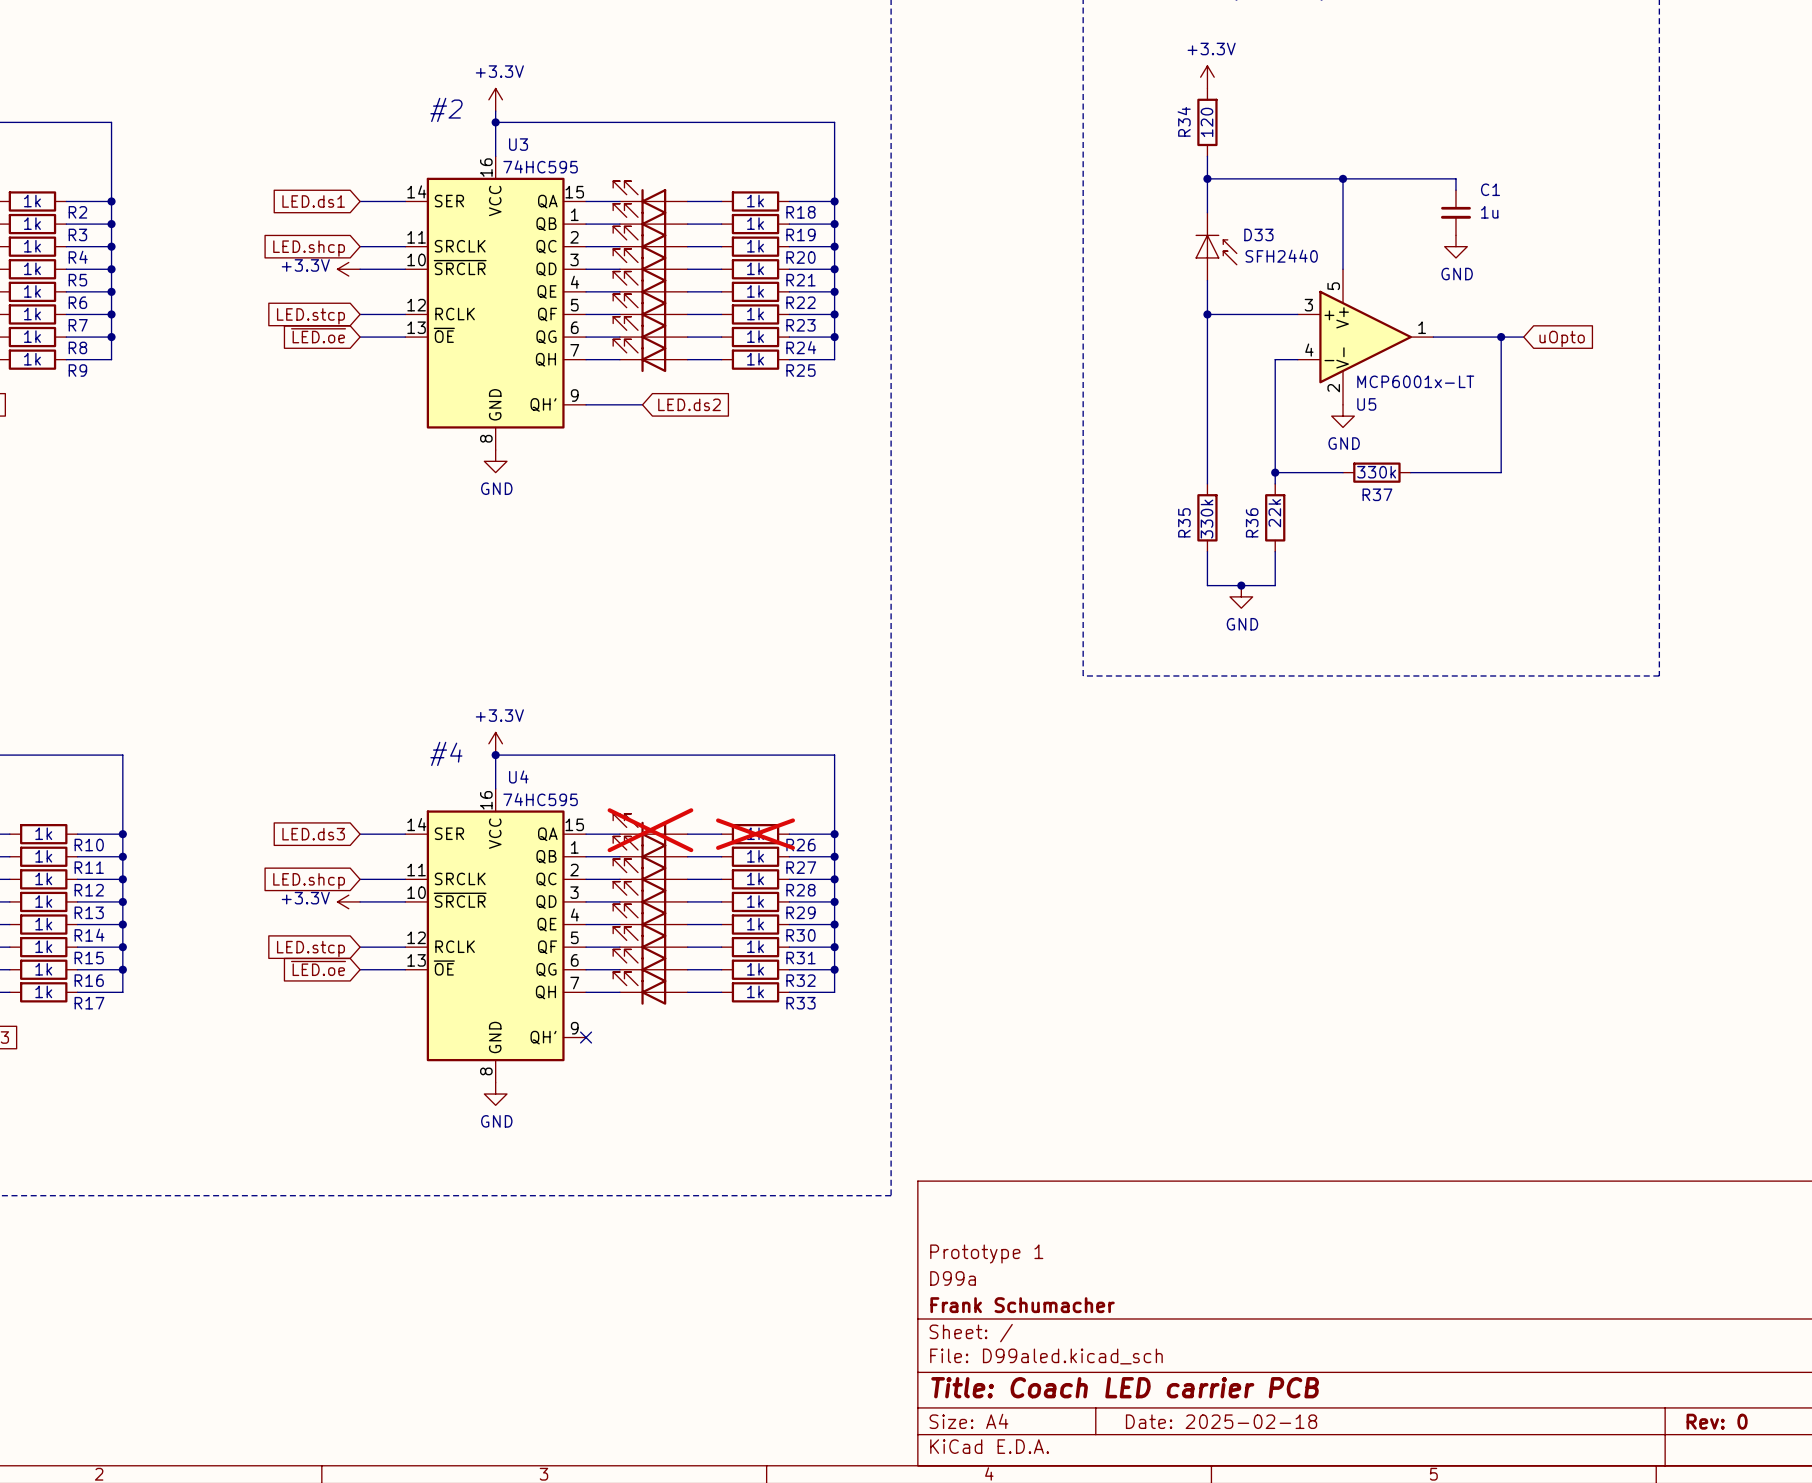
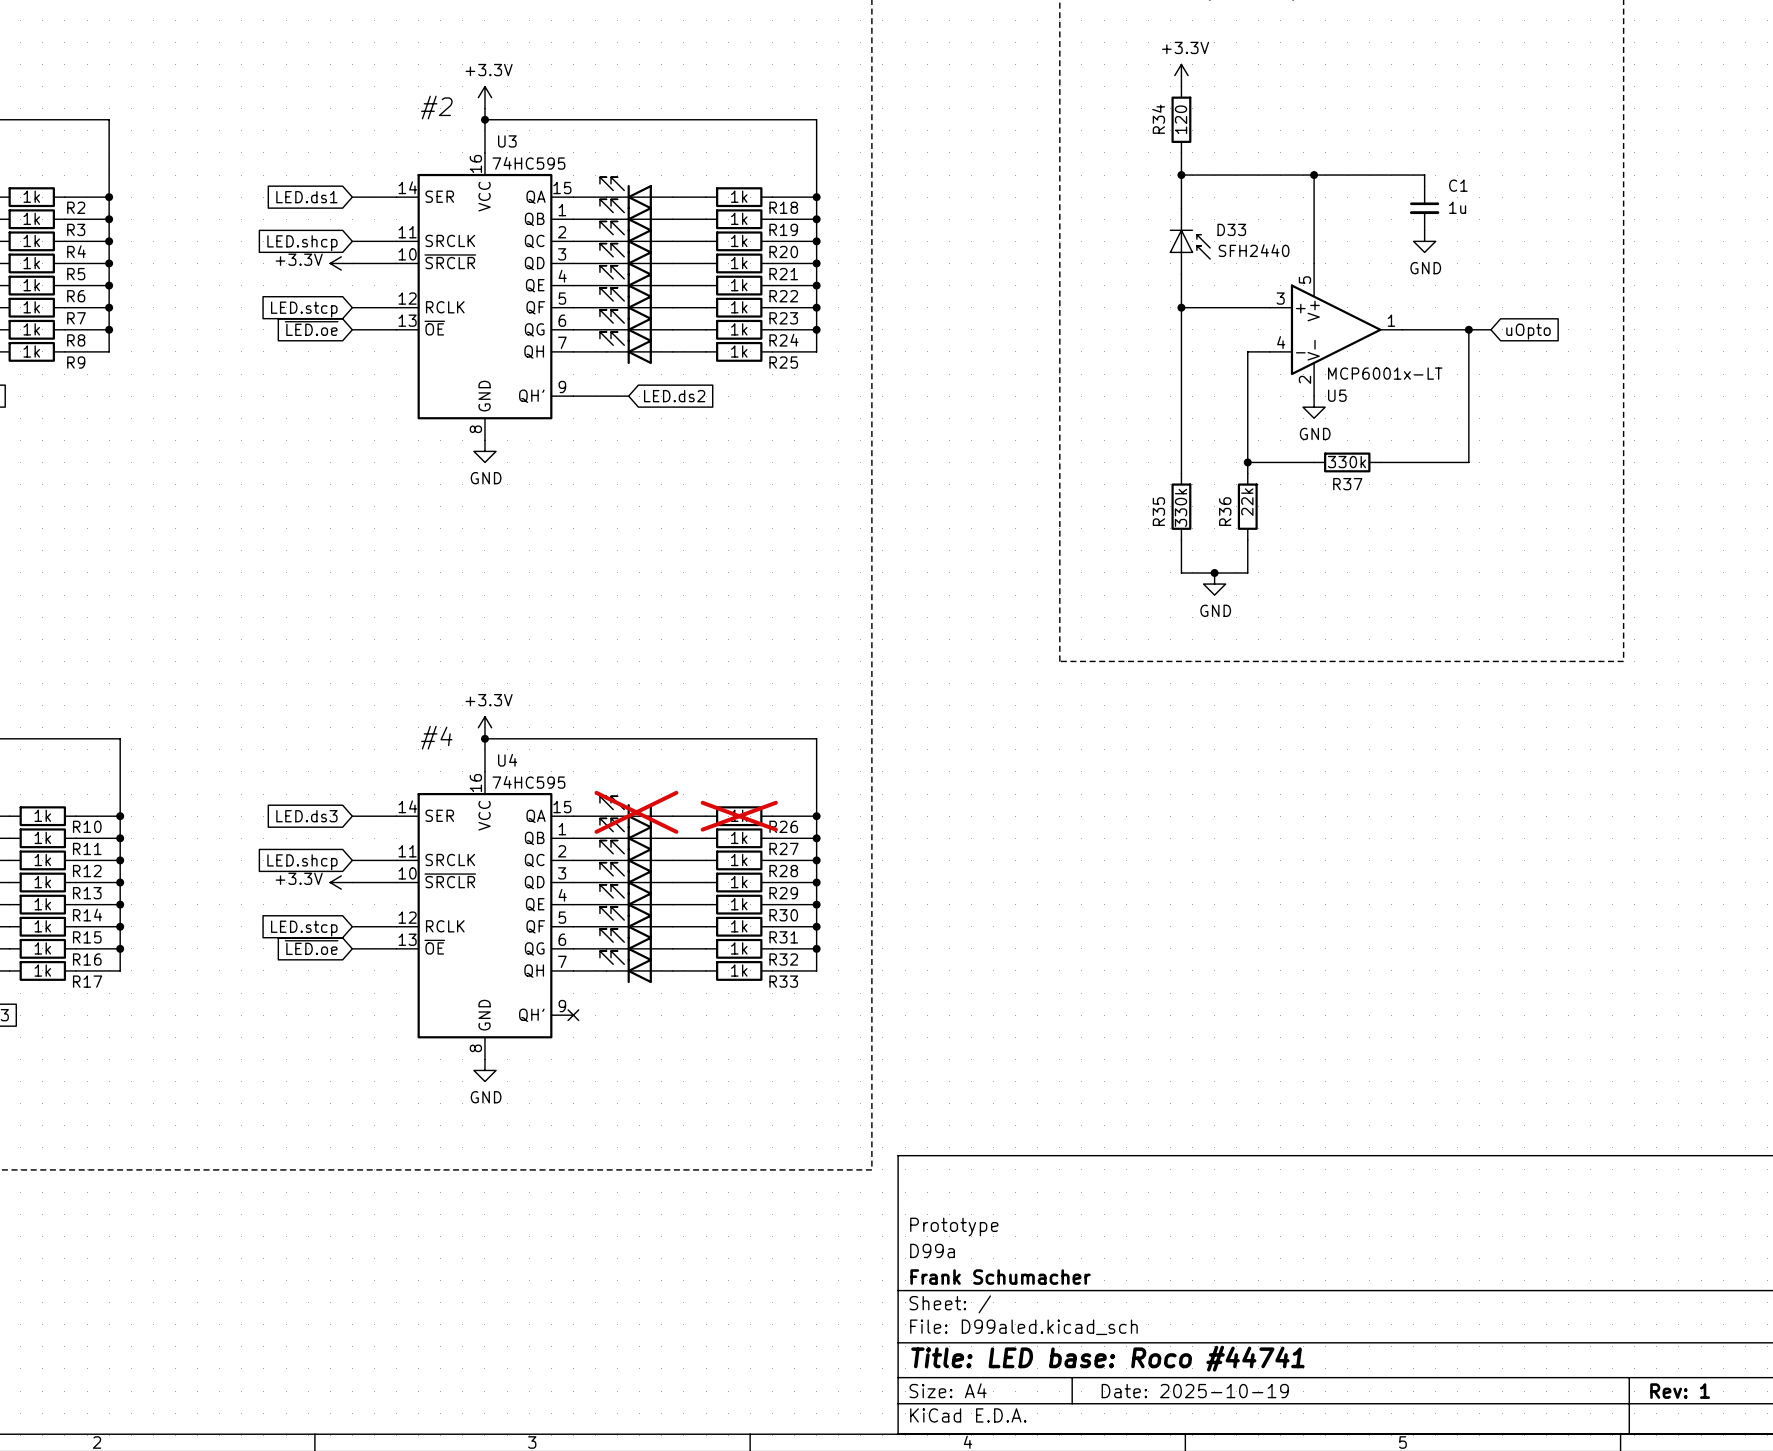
title block: Prototype 1 (986, 1254) -> Prototype (954, 1226)
title block: Title: Coach LED carrier PCB (1125, 1387) -> Title: LED base: Roco #44741 (1107, 1358)
title block: Date: 2025-02-18 (1221, 1421) -> Date: 2025-10-19 (1195, 1391)
title block: Rev: 0 (1717, 1421) -> Rev: 1 (1680, 1391)

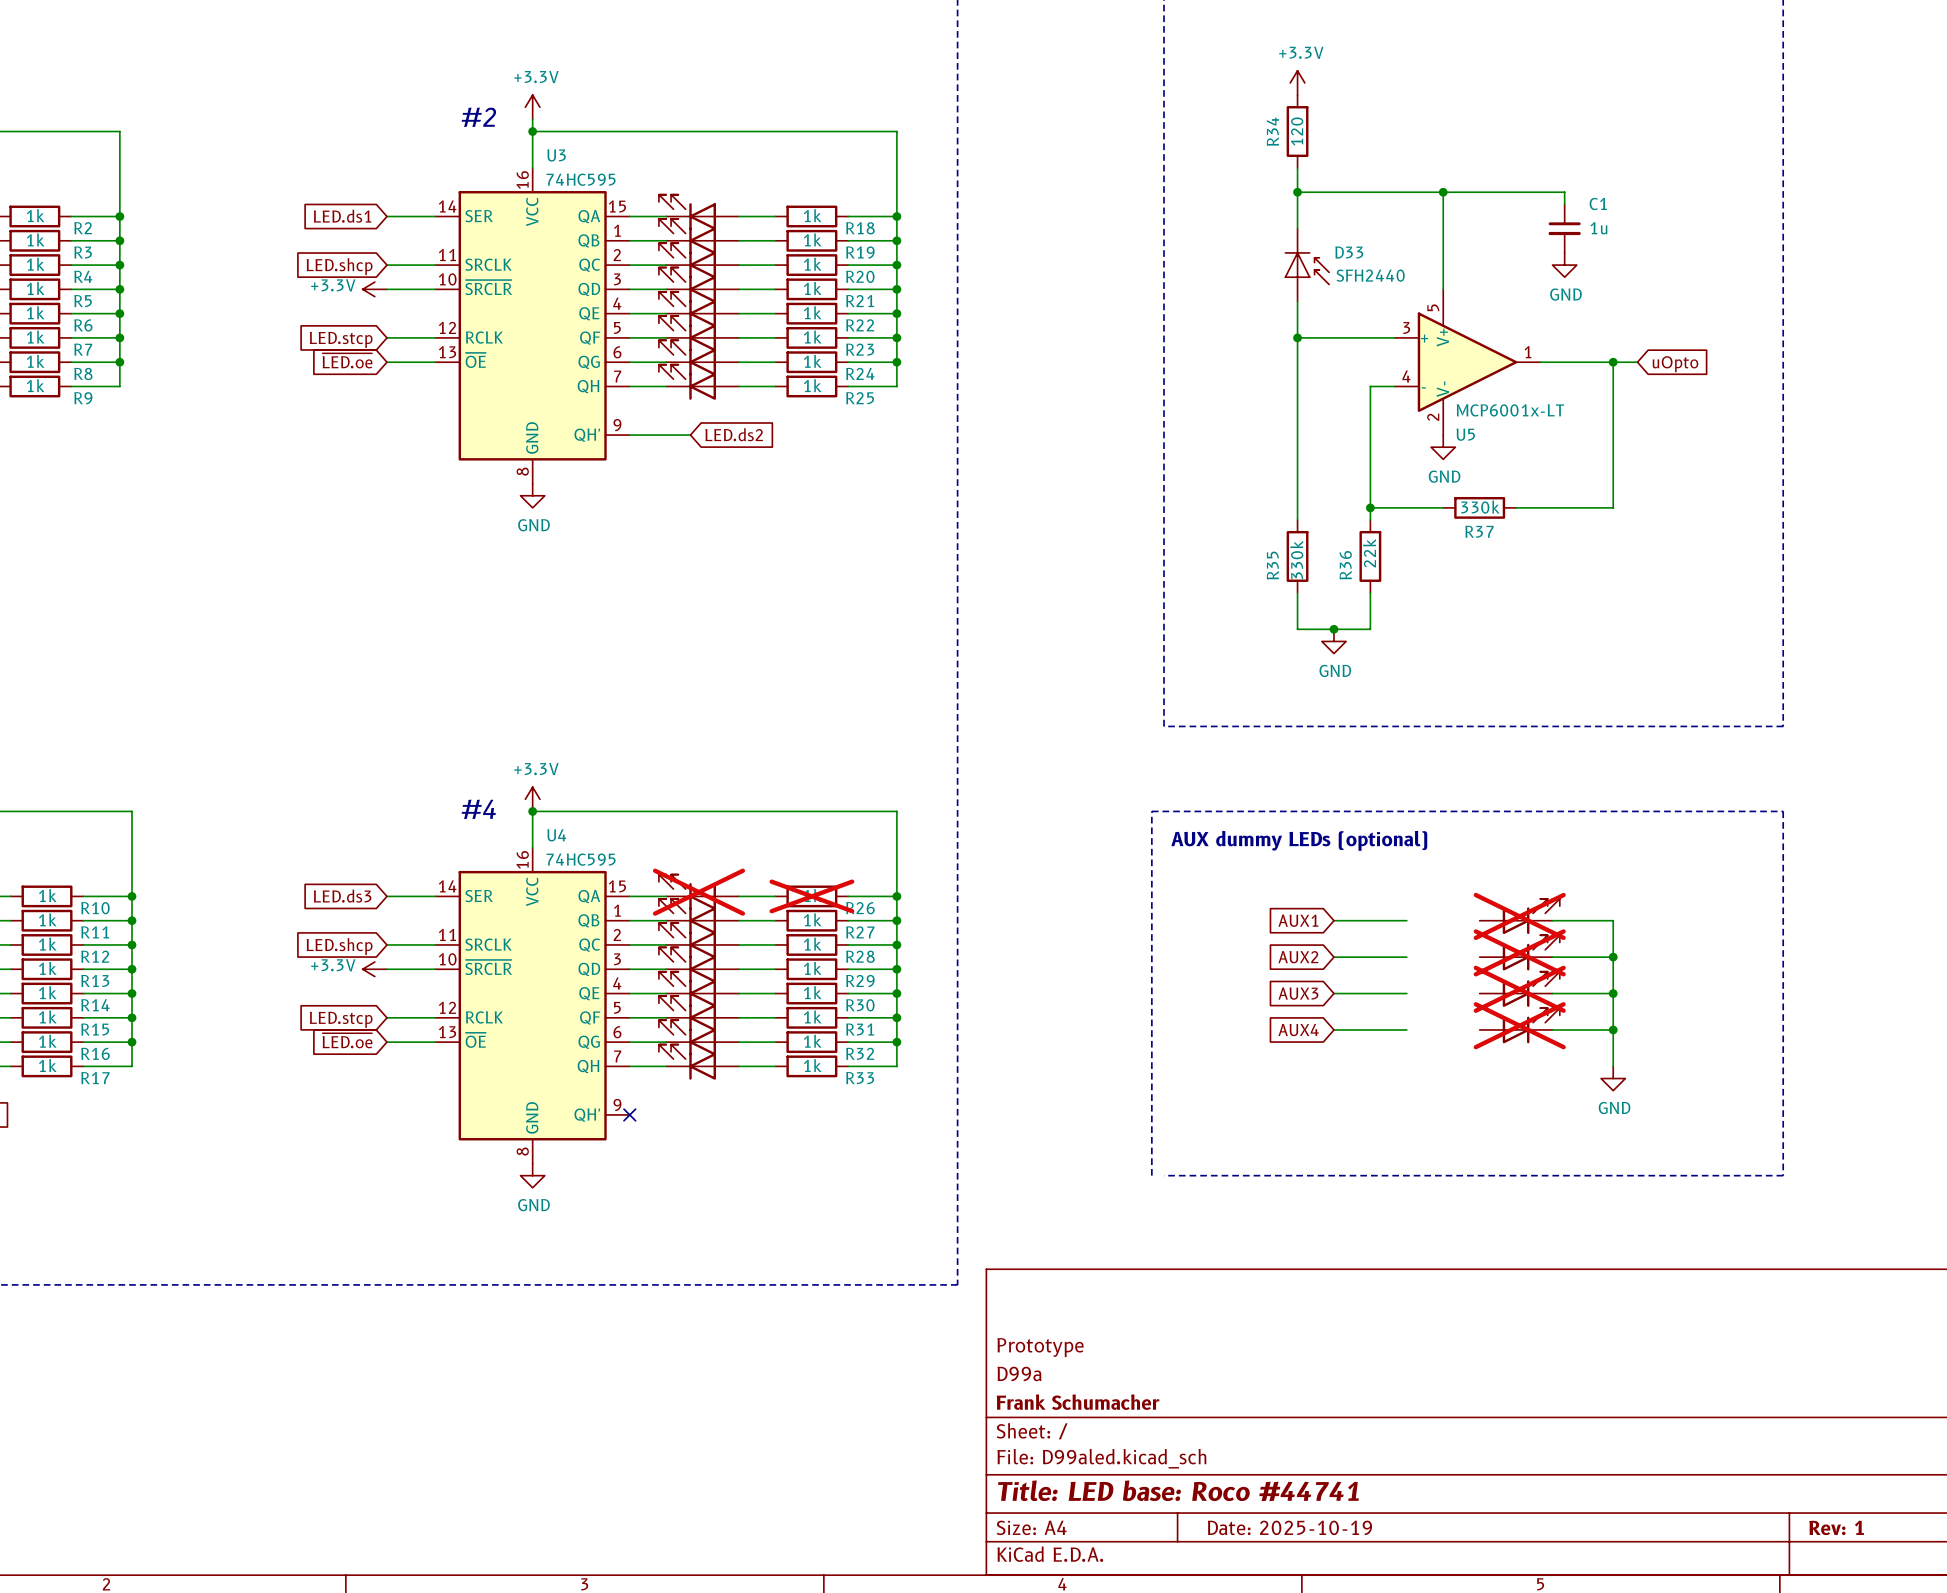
text: none -> AUX dummy LEDs (optional) (1299, 840)
part: none -> (1519, 916)
global label: none -> AUX1 (1298, 920)
wire: none -> (1333, 920) (1406, 920)
wire: none -> (1552, 920) (1613, 920) (1613, 1066)
part: none -> (1519, 952)
global label: none -> AUX2 (1298, 957)
wire: none -> (1333, 957) (1406, 957)
wire: none -> (1552, 957) (1613, 957)
junction: none -> (1613, 957)
part: none -> (1519, 989)
global label: none -> AUX3 (1298, 993)
wire: none -> (1333, 993) (1406, 993)
wire: none -> (1552, 993) (1613, 993)
junction: none -> (1613, 993)
part: none -> (1519, 1025)
global label: none -> AUX4 (1298, 1030)
wire: none -> (1333, 1029) (1406, 1029)
wire: none -> (1552, 1029) (1613, 1029)
junction: none -> (1613, 1029)
power symbol: none -> GND (1613, 1078)
line: none -> (1151, 1175) (1151, 811) (1783, 811) (1783, 1175) (1164, 1175)

